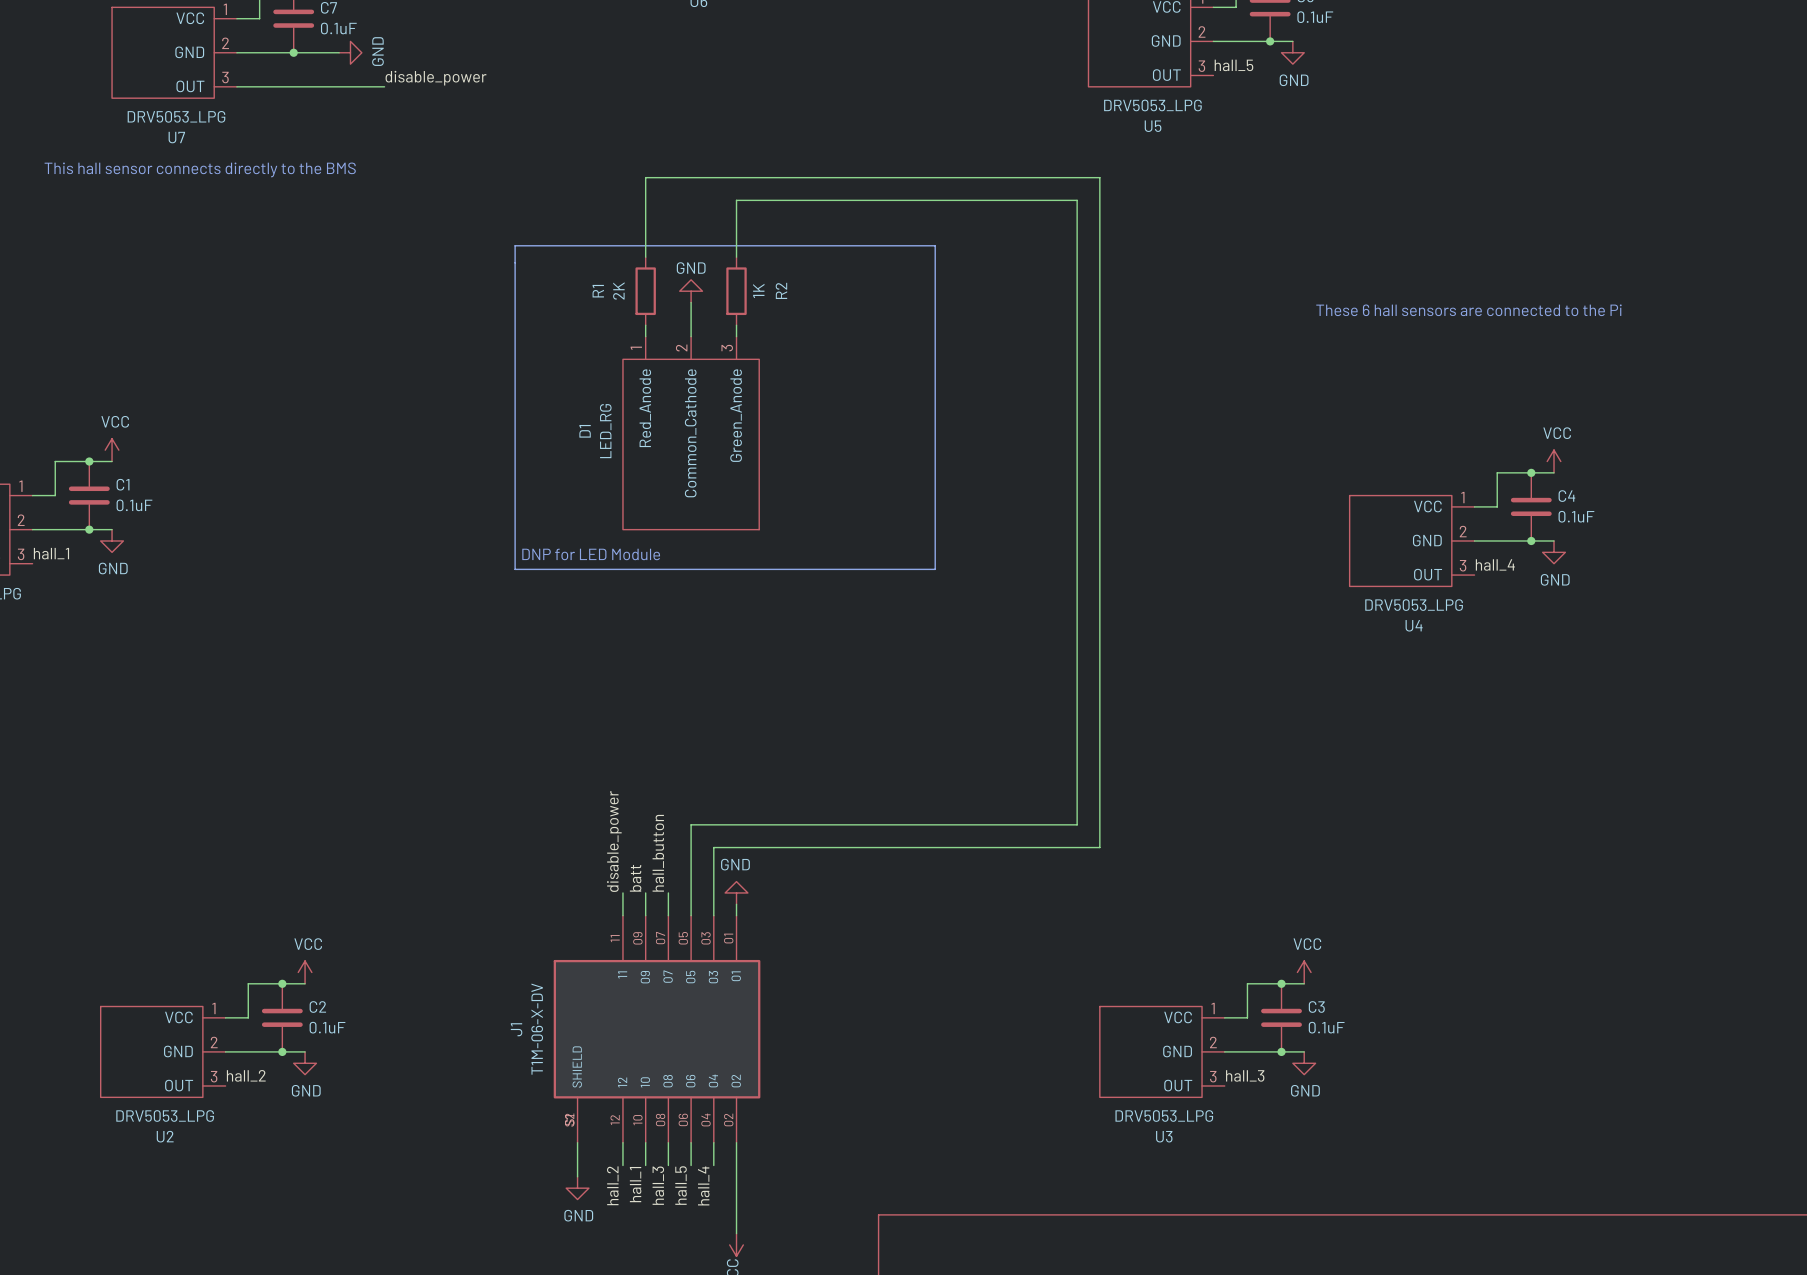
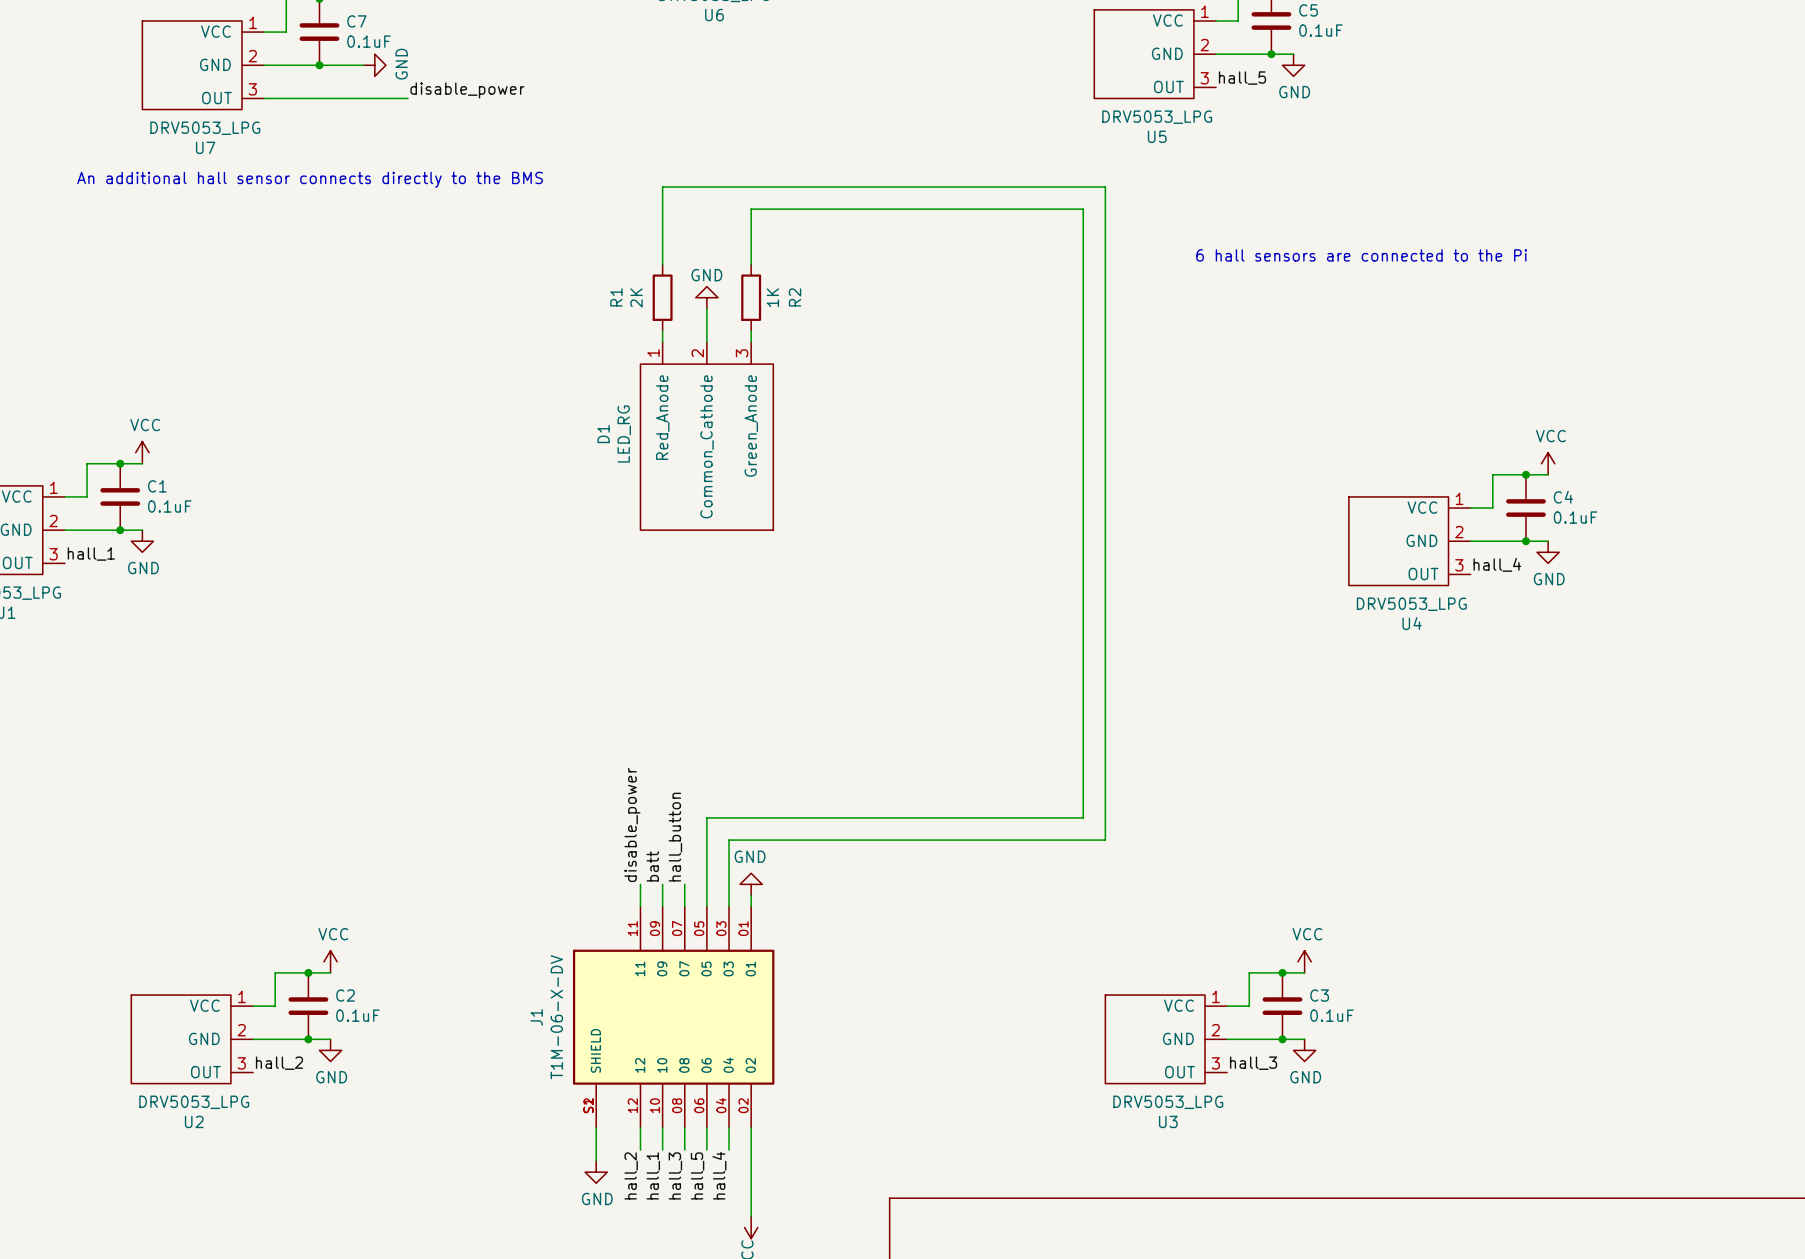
text: This hall sensor connects directly to the BMS (200, 169) -> An additional hall sensor connects directly to the BMS (310, 179)
line: (515, 245) (935, 245) (935, 569) (515, 569) (515, 245) -> none
text: none -> 6 hall sensors are connected to the Pi (1361, 255)
text: These 6 hall sensors are connected to the Pi (1468, 310) -> none
text: DNP for LED Module (591, 554) -> none

